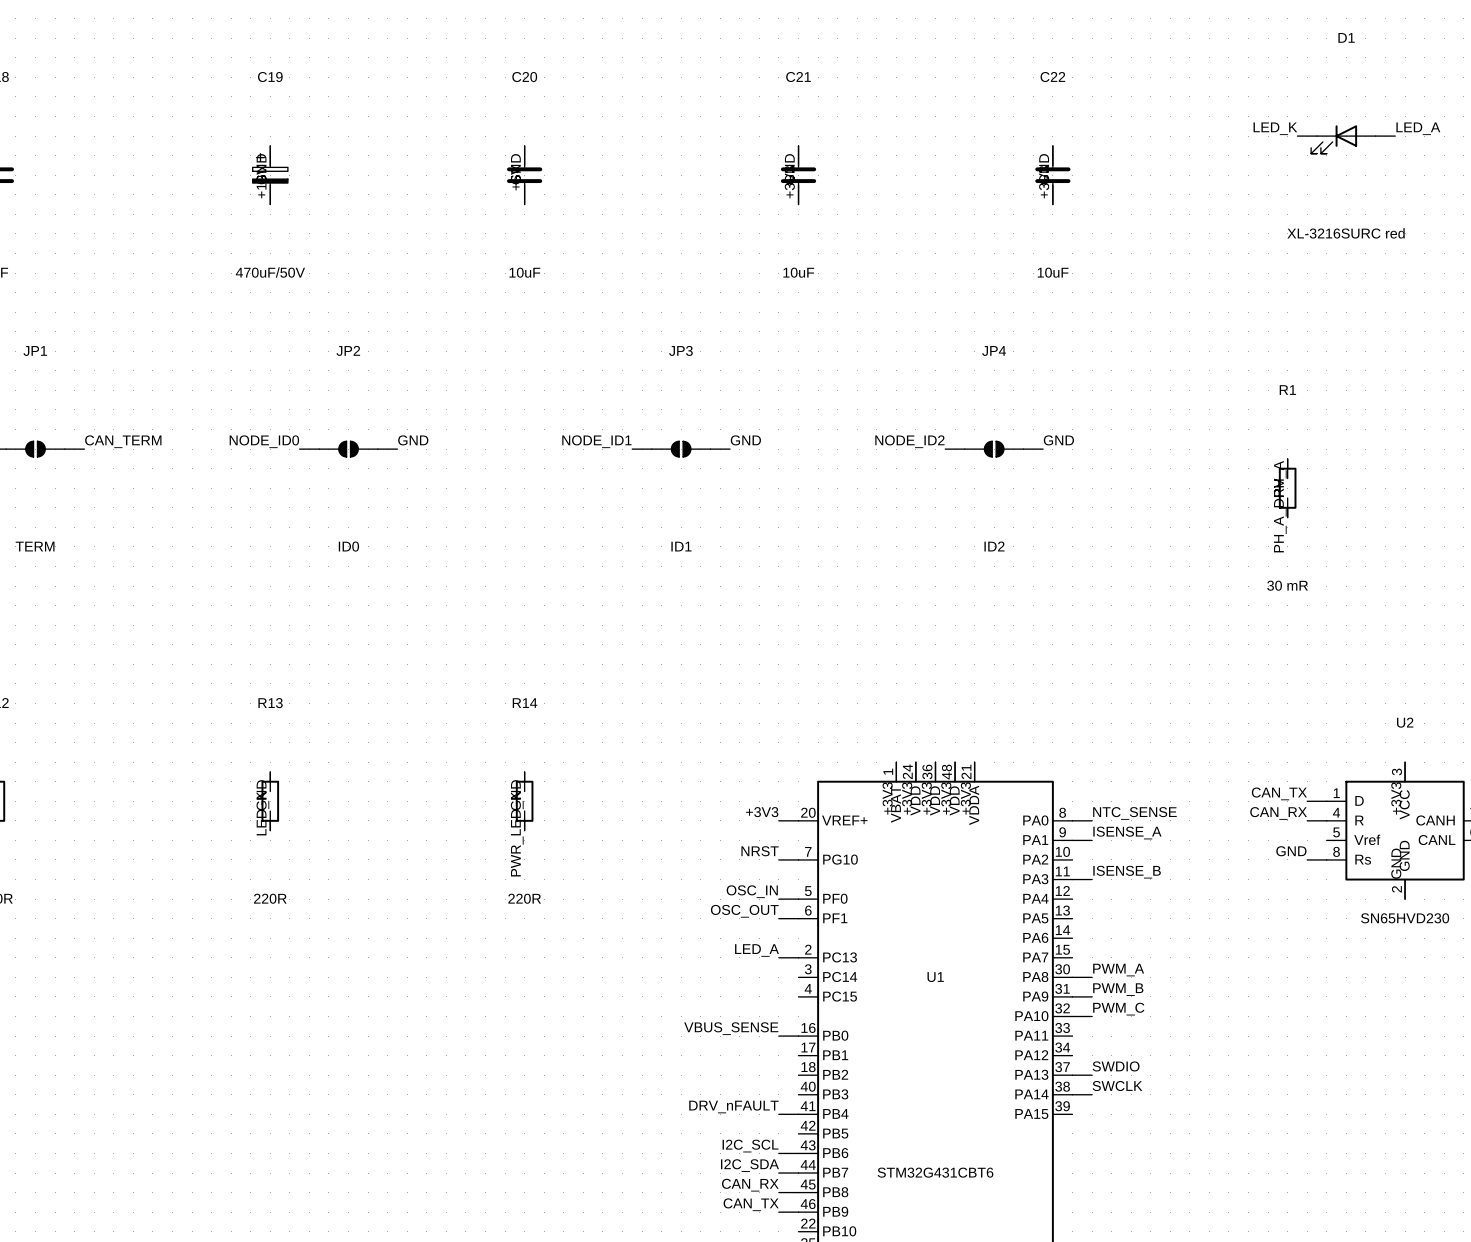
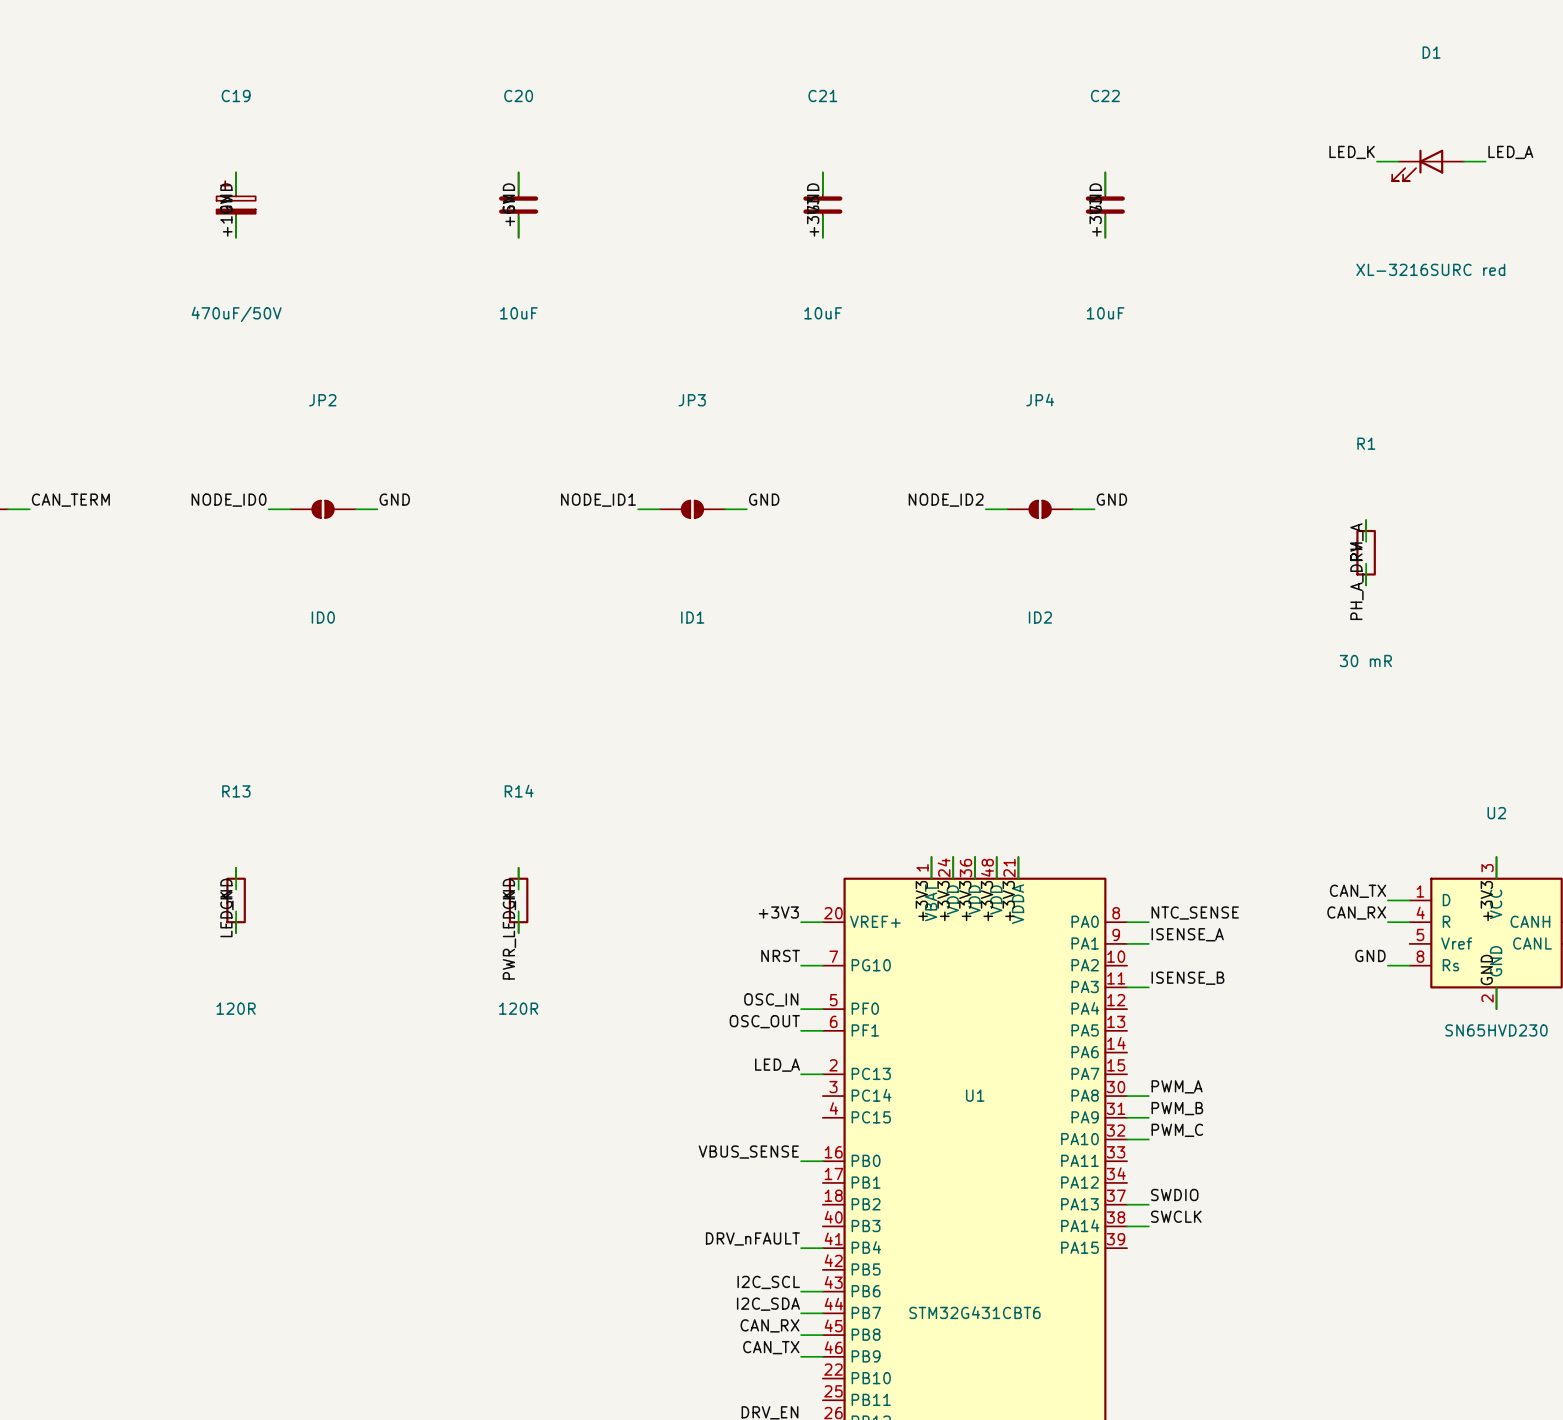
R13 value: 220R (270, 898) -> 120R (236, 1008)
R14 value: 220R (524, 898) -> 120R (518, 1008)

